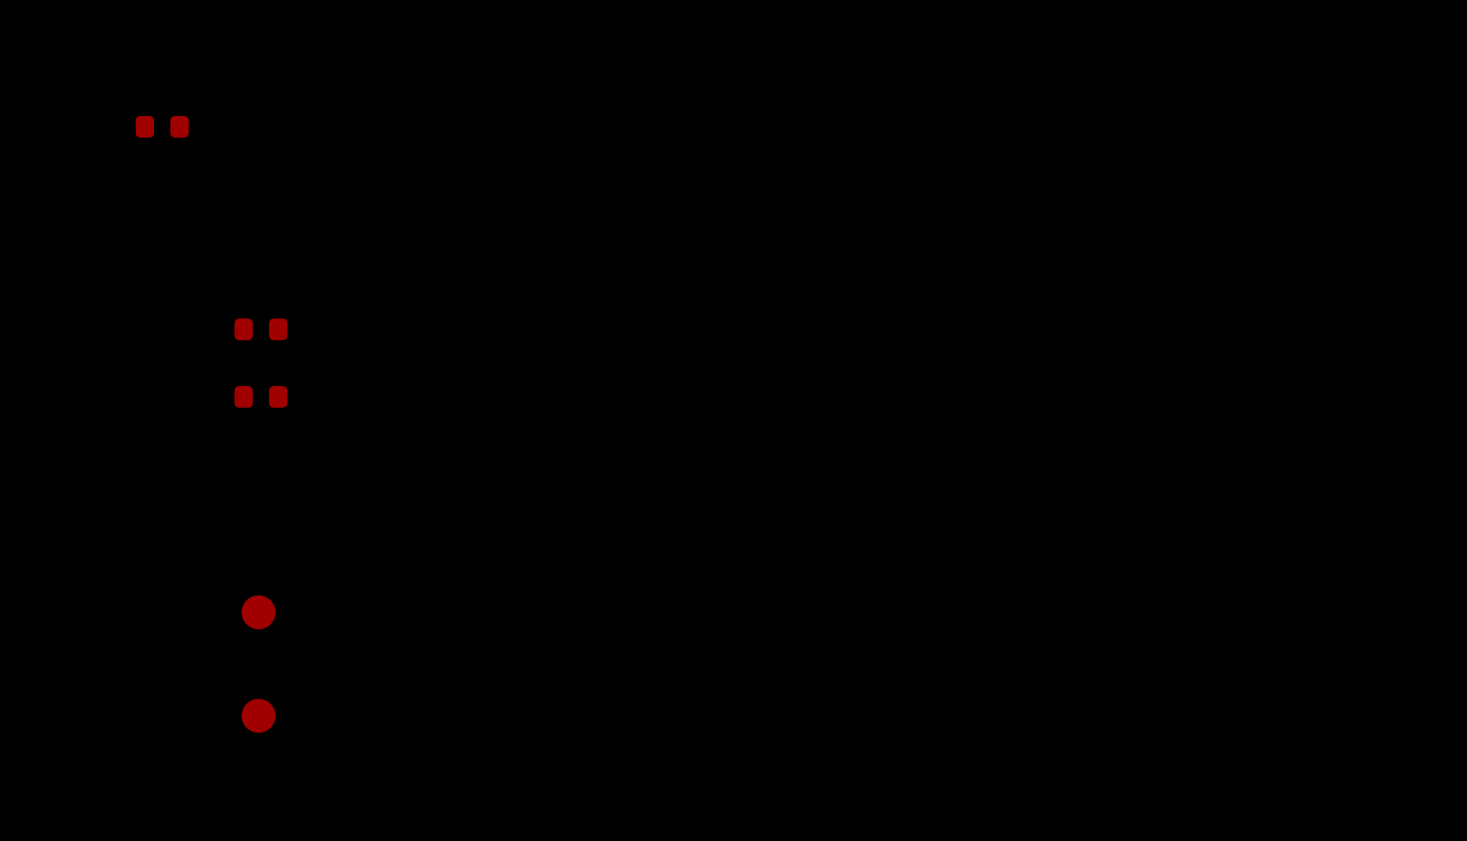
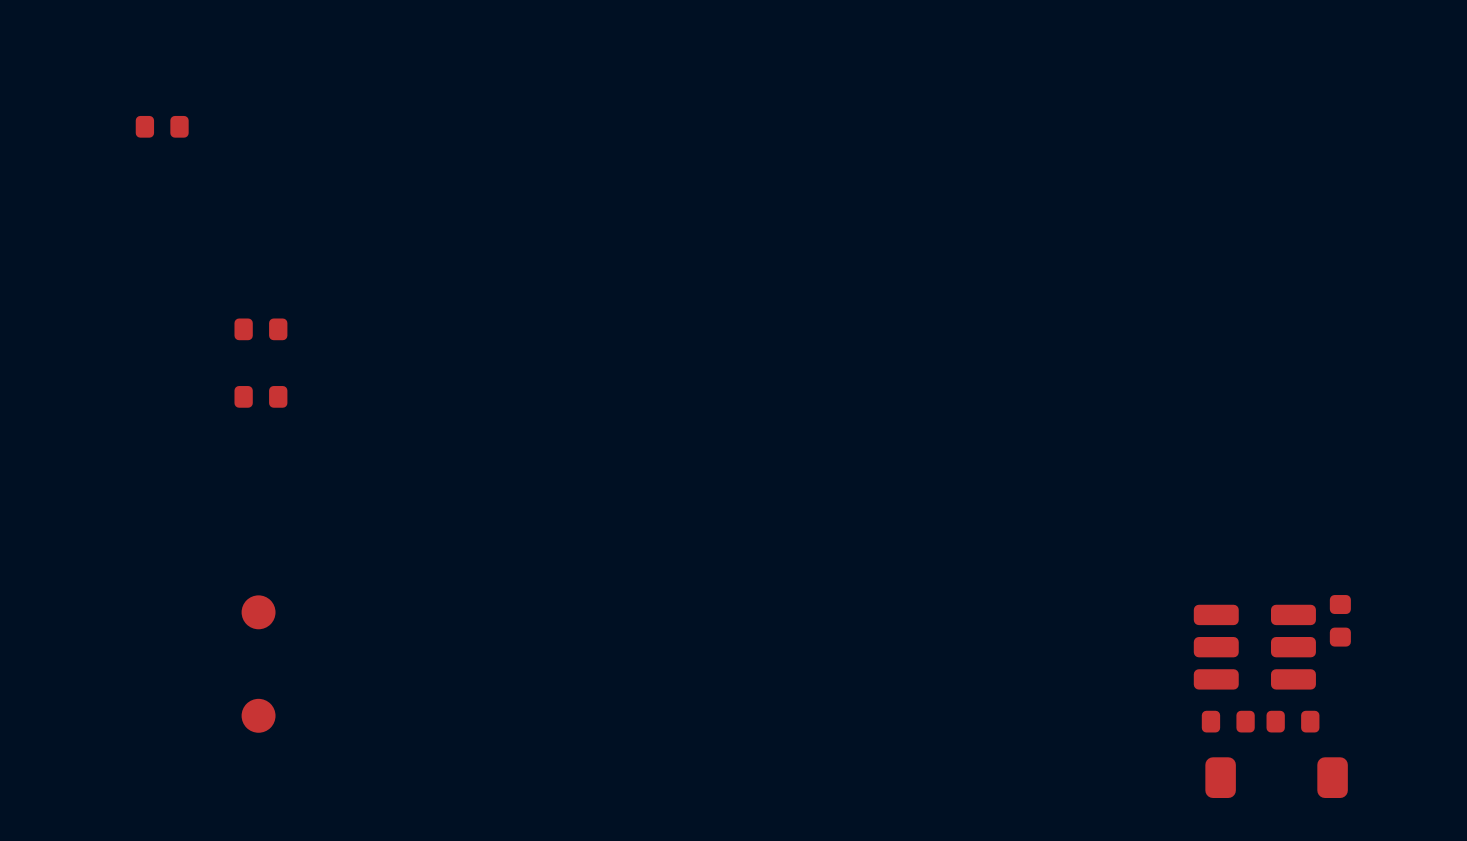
part: none -> (1340, 620)
part: none -> (1254, 647)
part: none -> (1228, 721)
part: none -> (1292, 721)
part: none -> (1276, 777)

